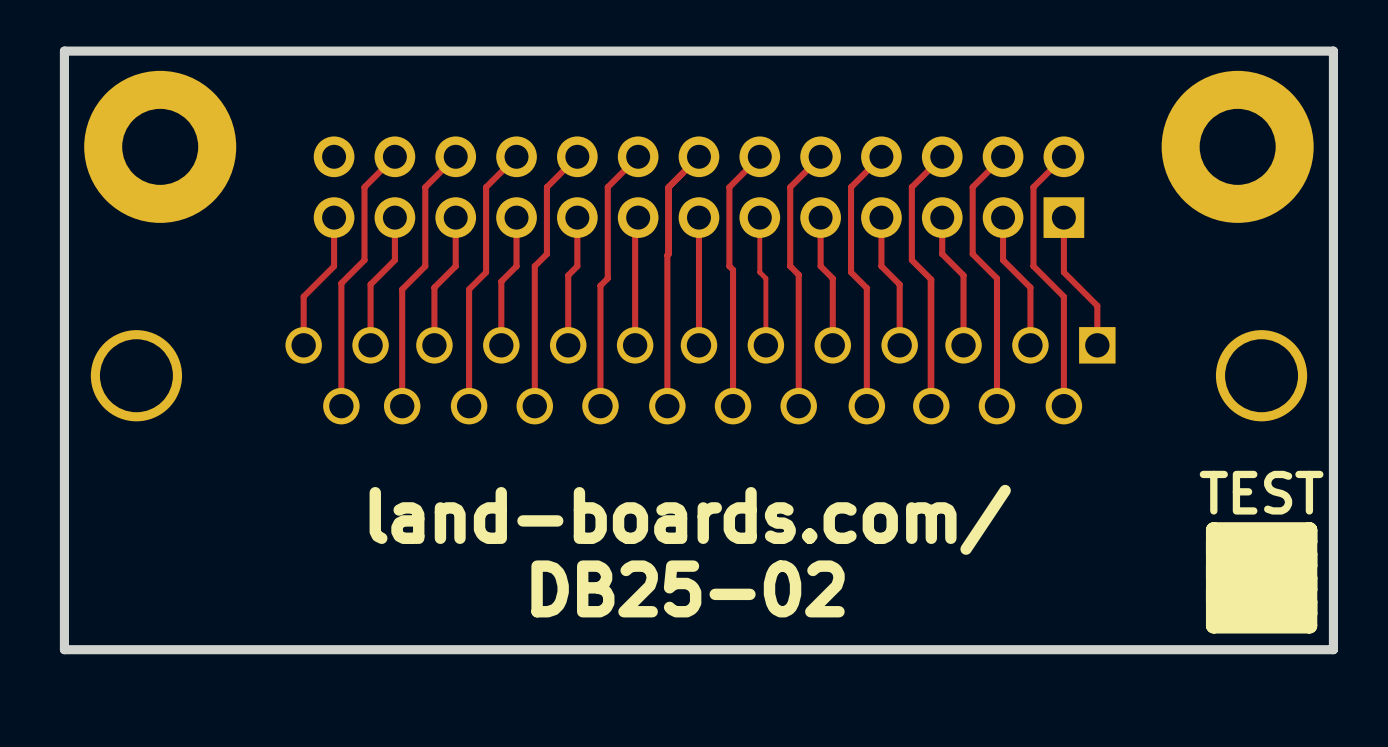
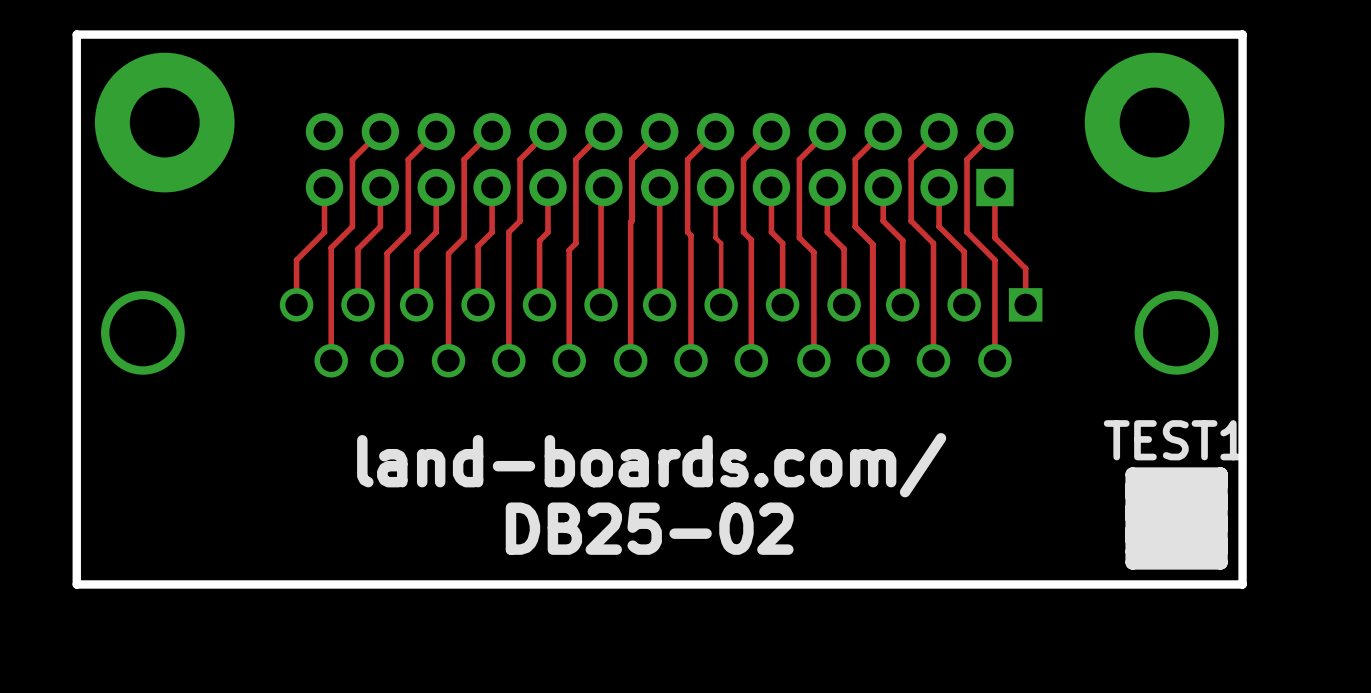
TEST name: TEST (1261, 492) -> TEST1 (1174, 440)

